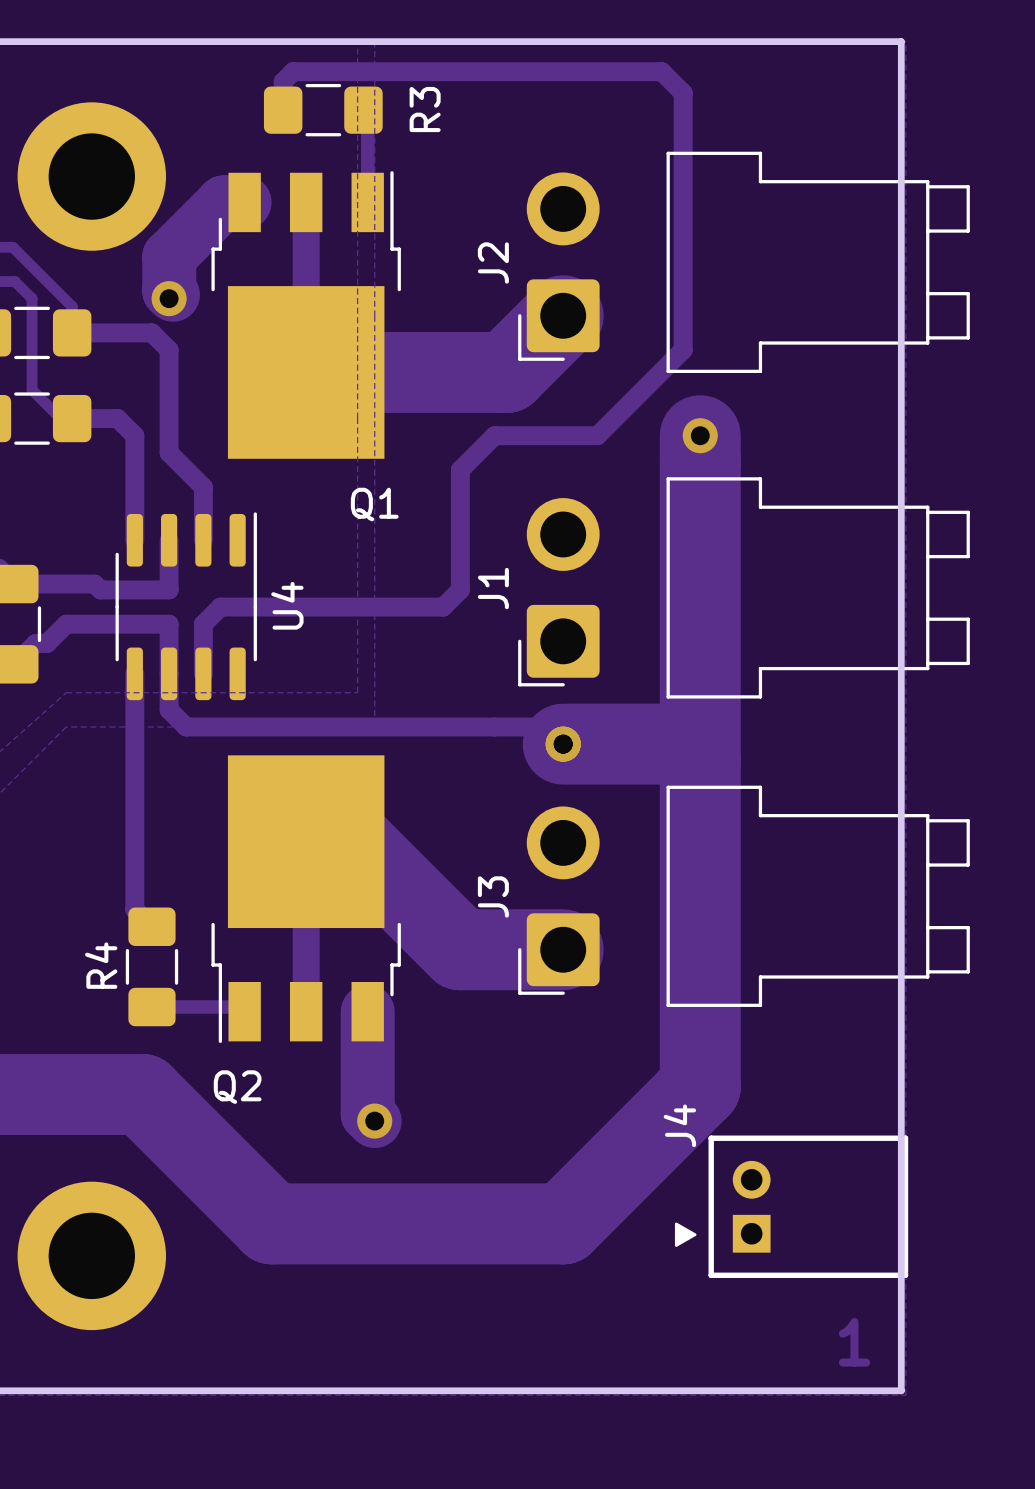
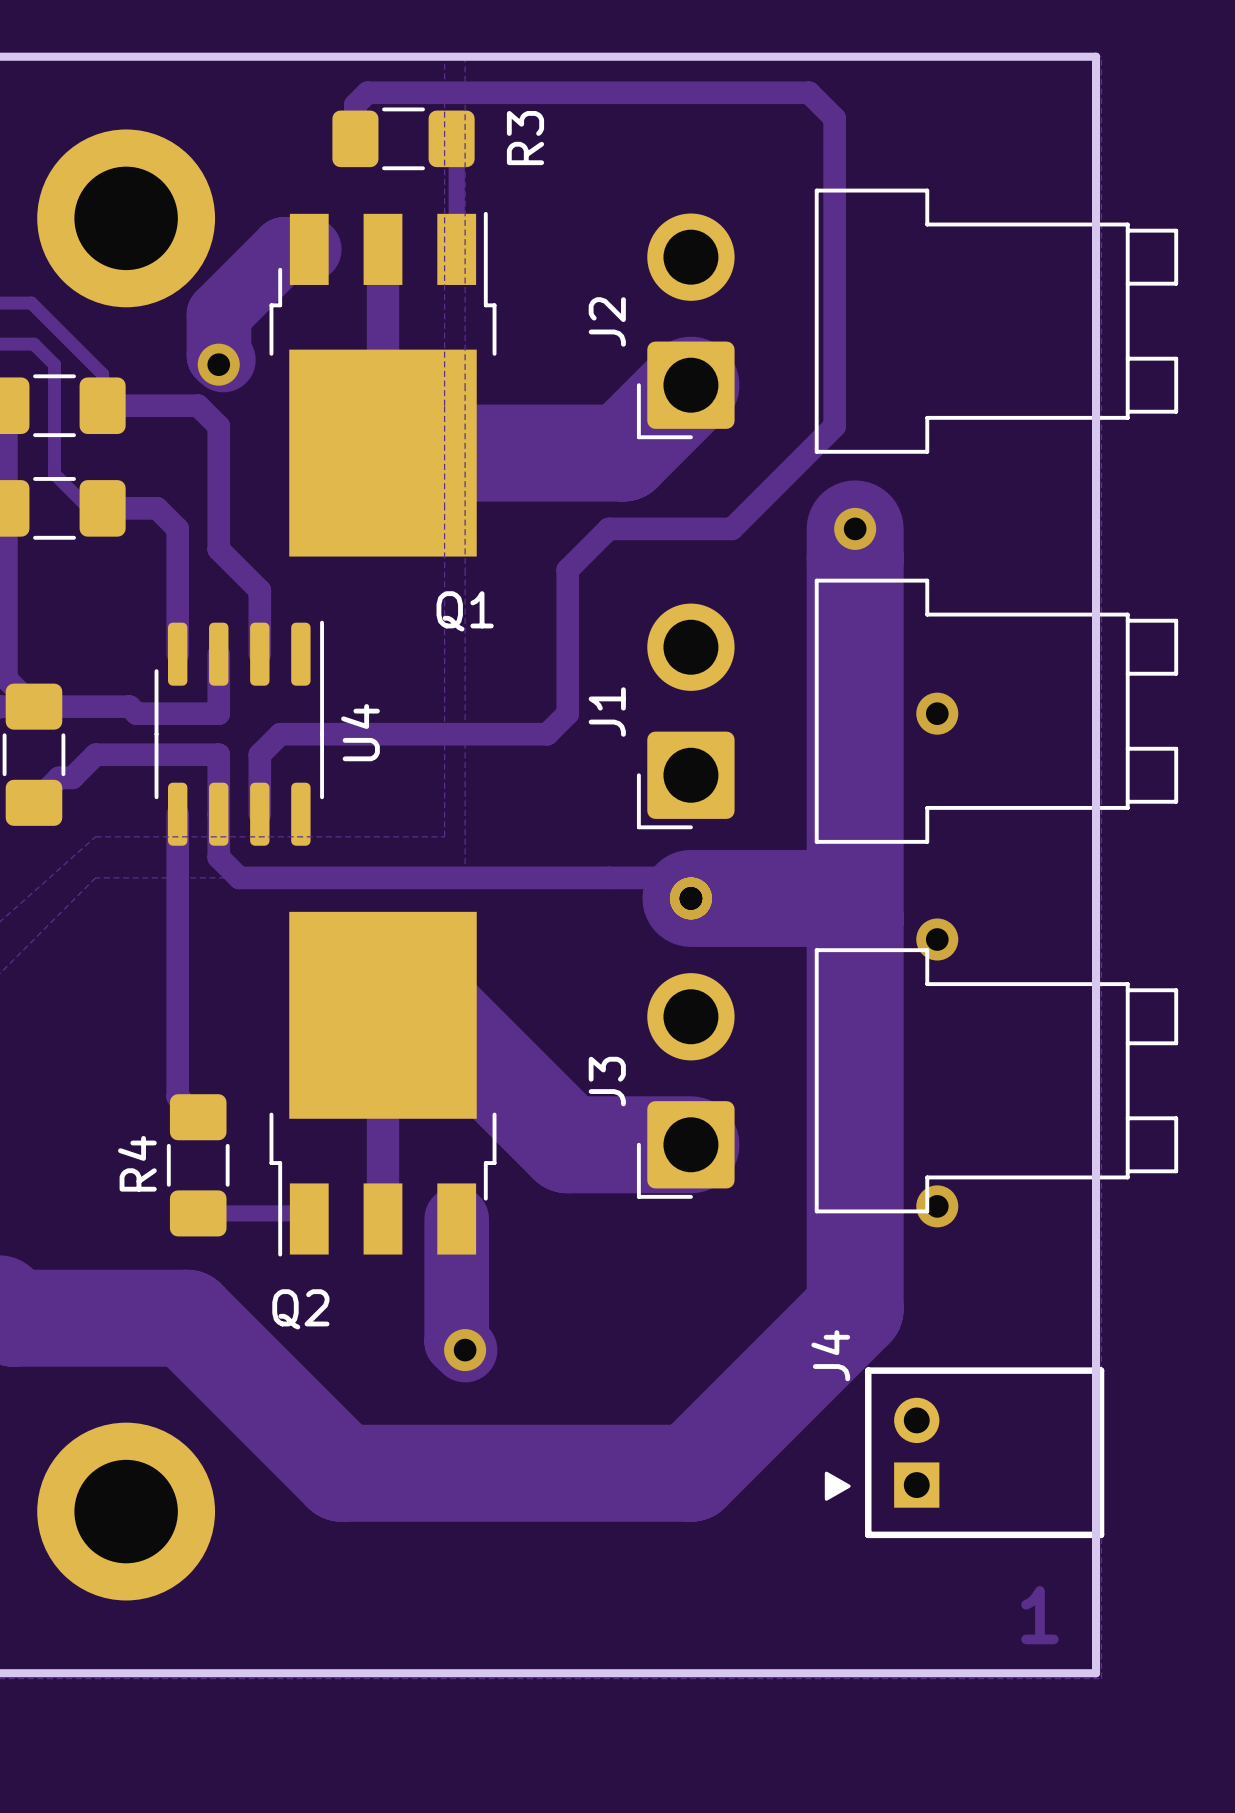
via: none -> (937, 713)
via: none -> (937, 939)
via: none -> (937, 1206)

